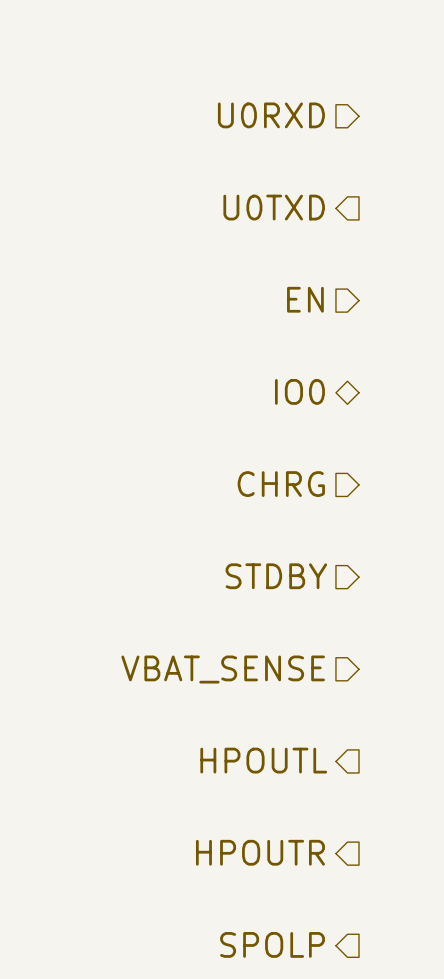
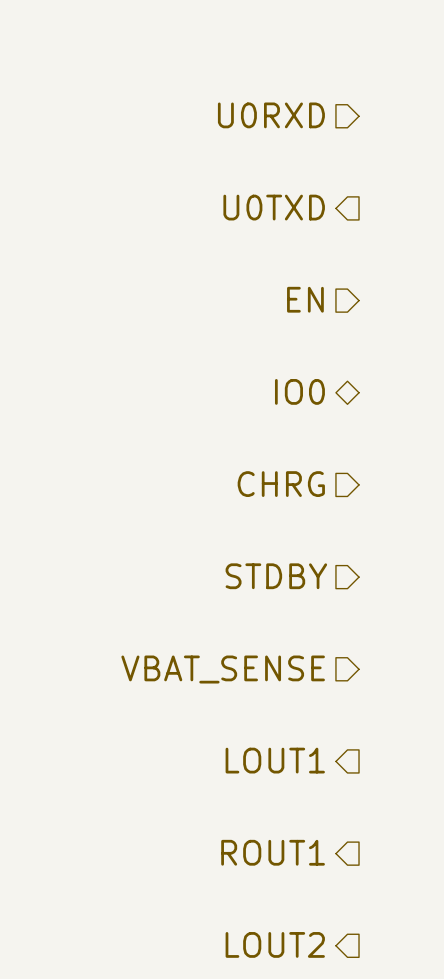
hierarchical label: HPOUTL (263, 760) -> LOUT1 (275, 760)
hierarchical label: HPOUTR (260, 852) -> ROUT1 (273, 852)
hierarchical label: SPOLP (272, 944) -> LOUT2 (275, 944)

